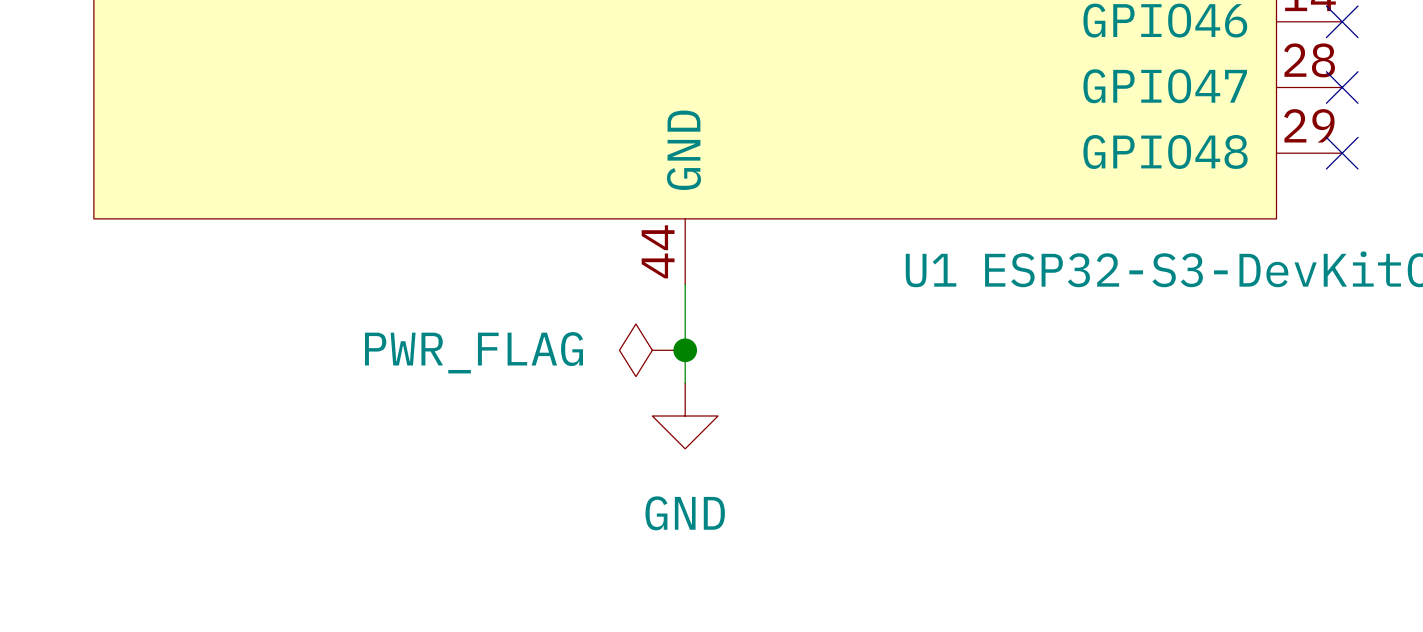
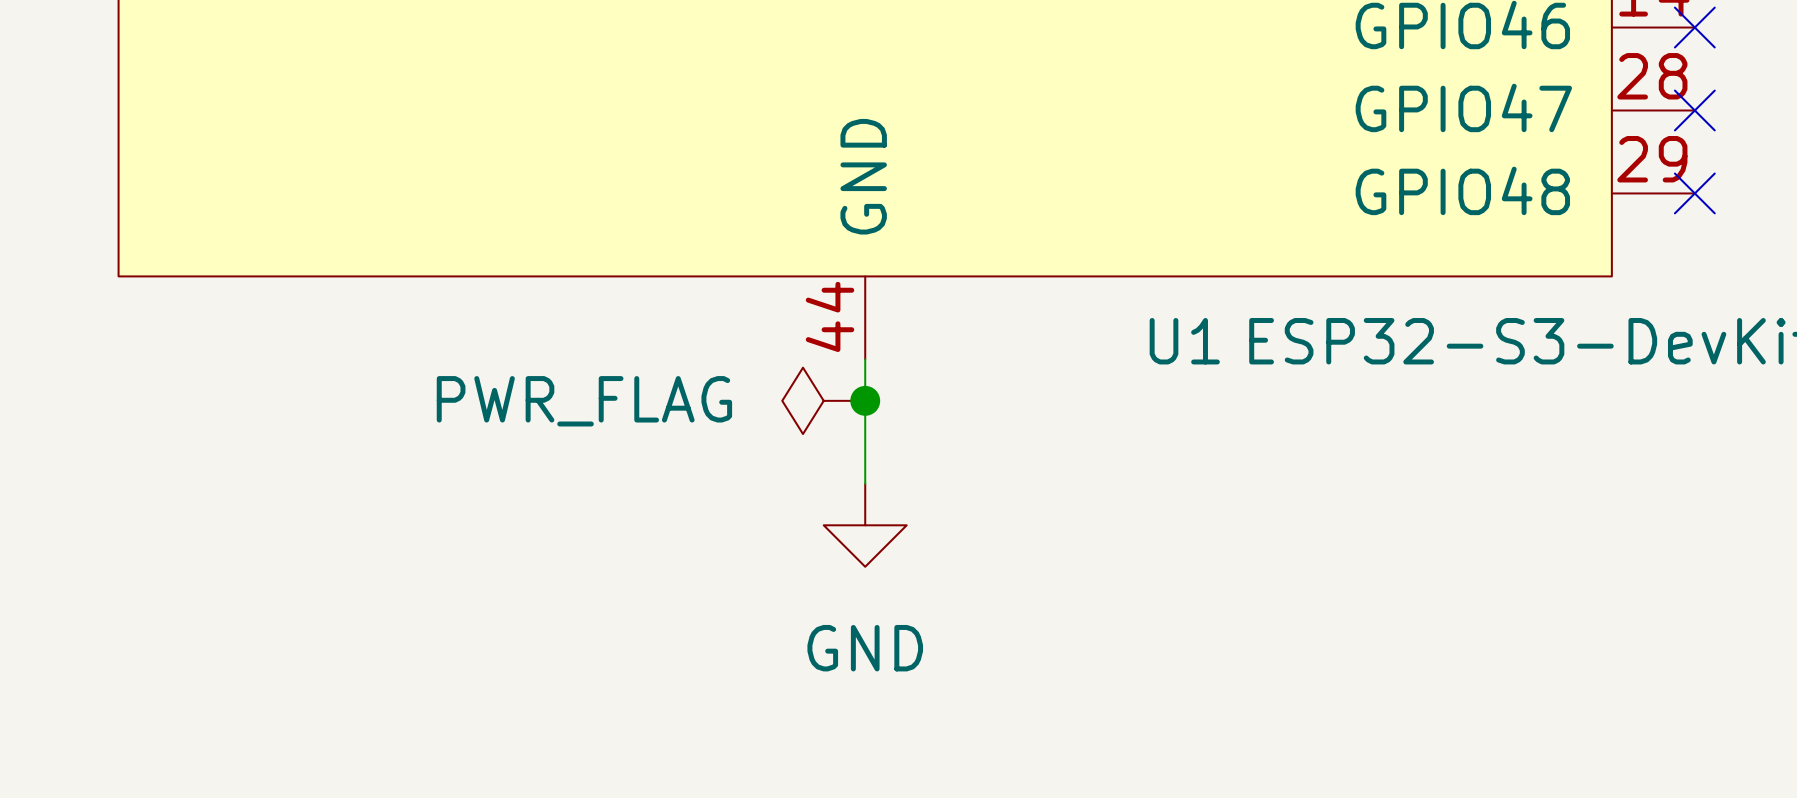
power symbol position: PWR_FLAG (652, 350) -> PWR_FLAG (823, 400)
junction position: (685, 350) -> (865, 400)

